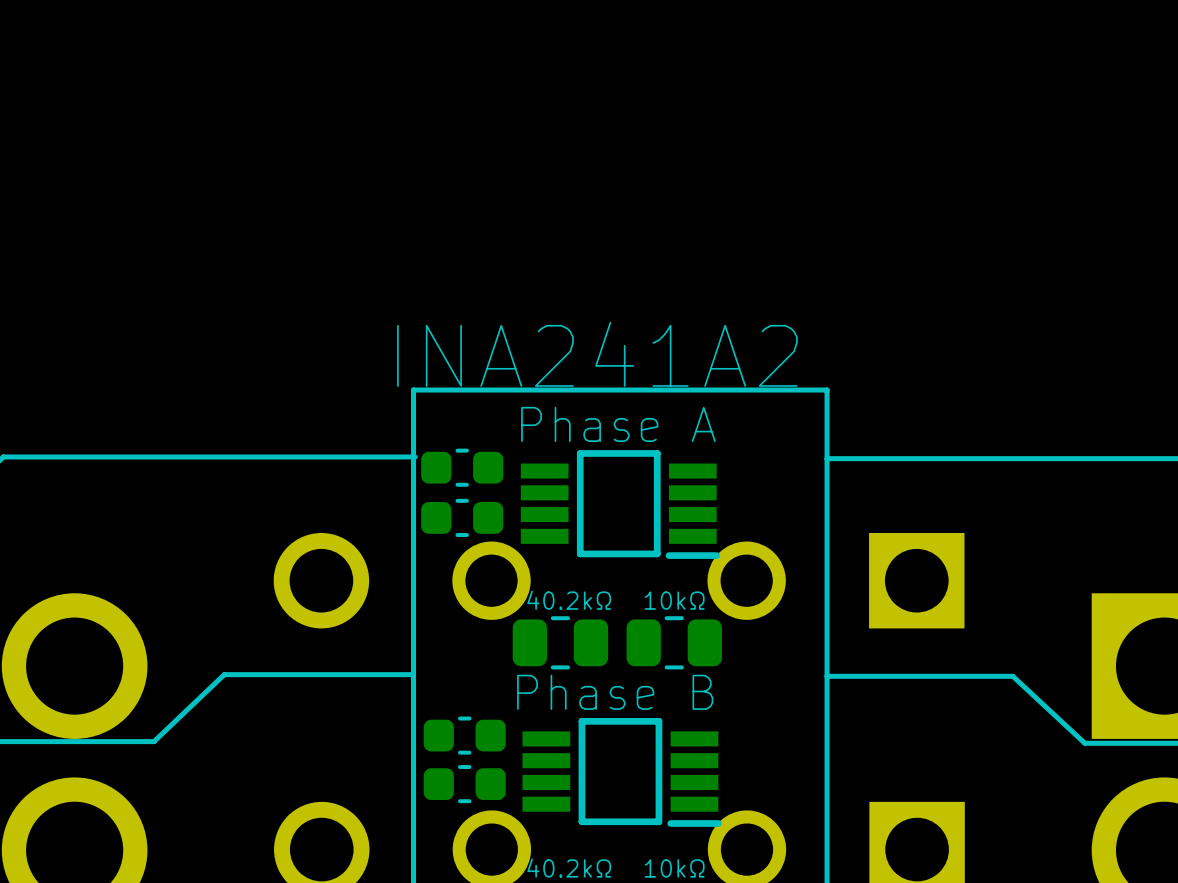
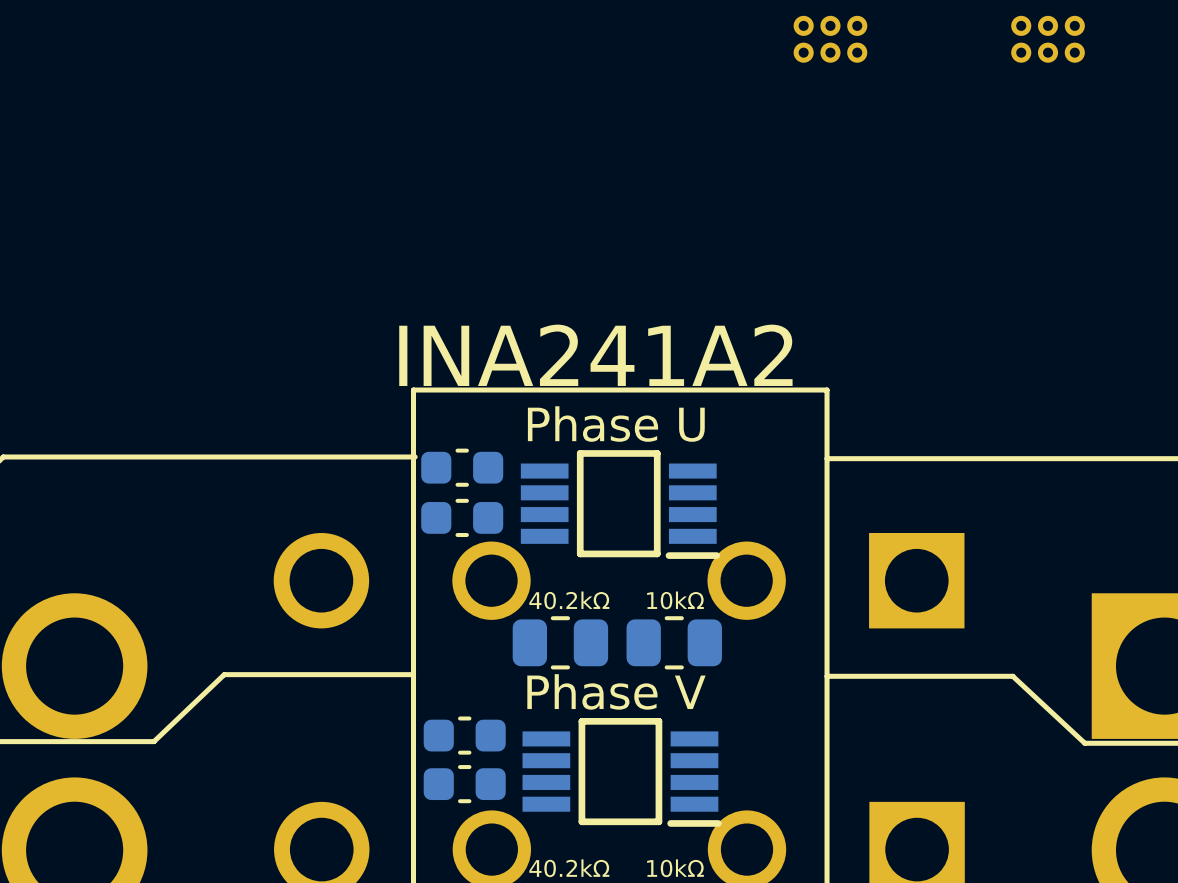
part: none -> (830, 39)
part: none -> (1048, 39)
text: Phase A (618, 424) -> Phase U (616, 424)
text: Phase B (615, 692) -> Phase V (616, 691)

